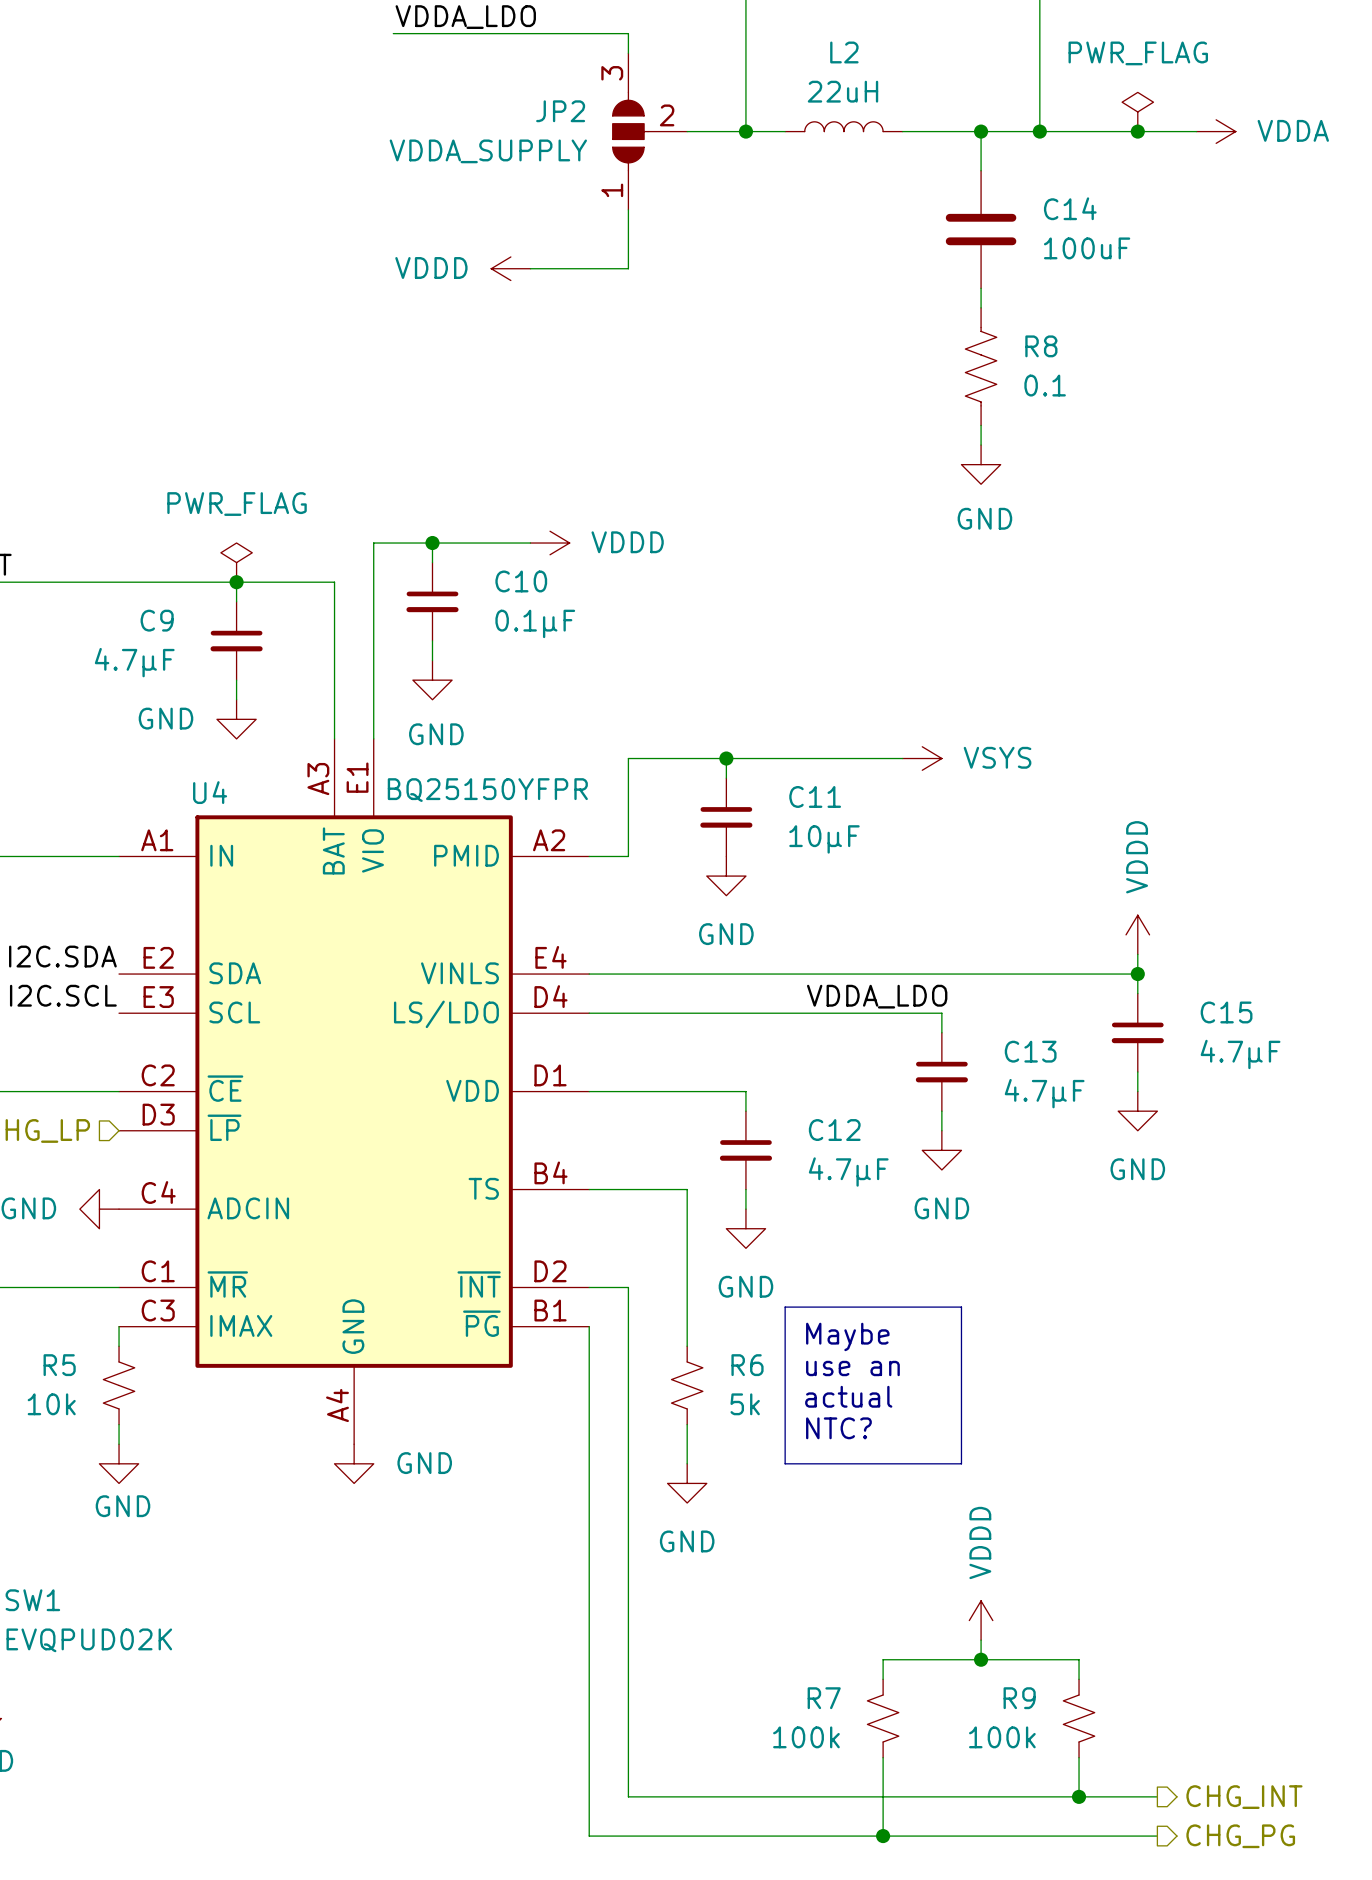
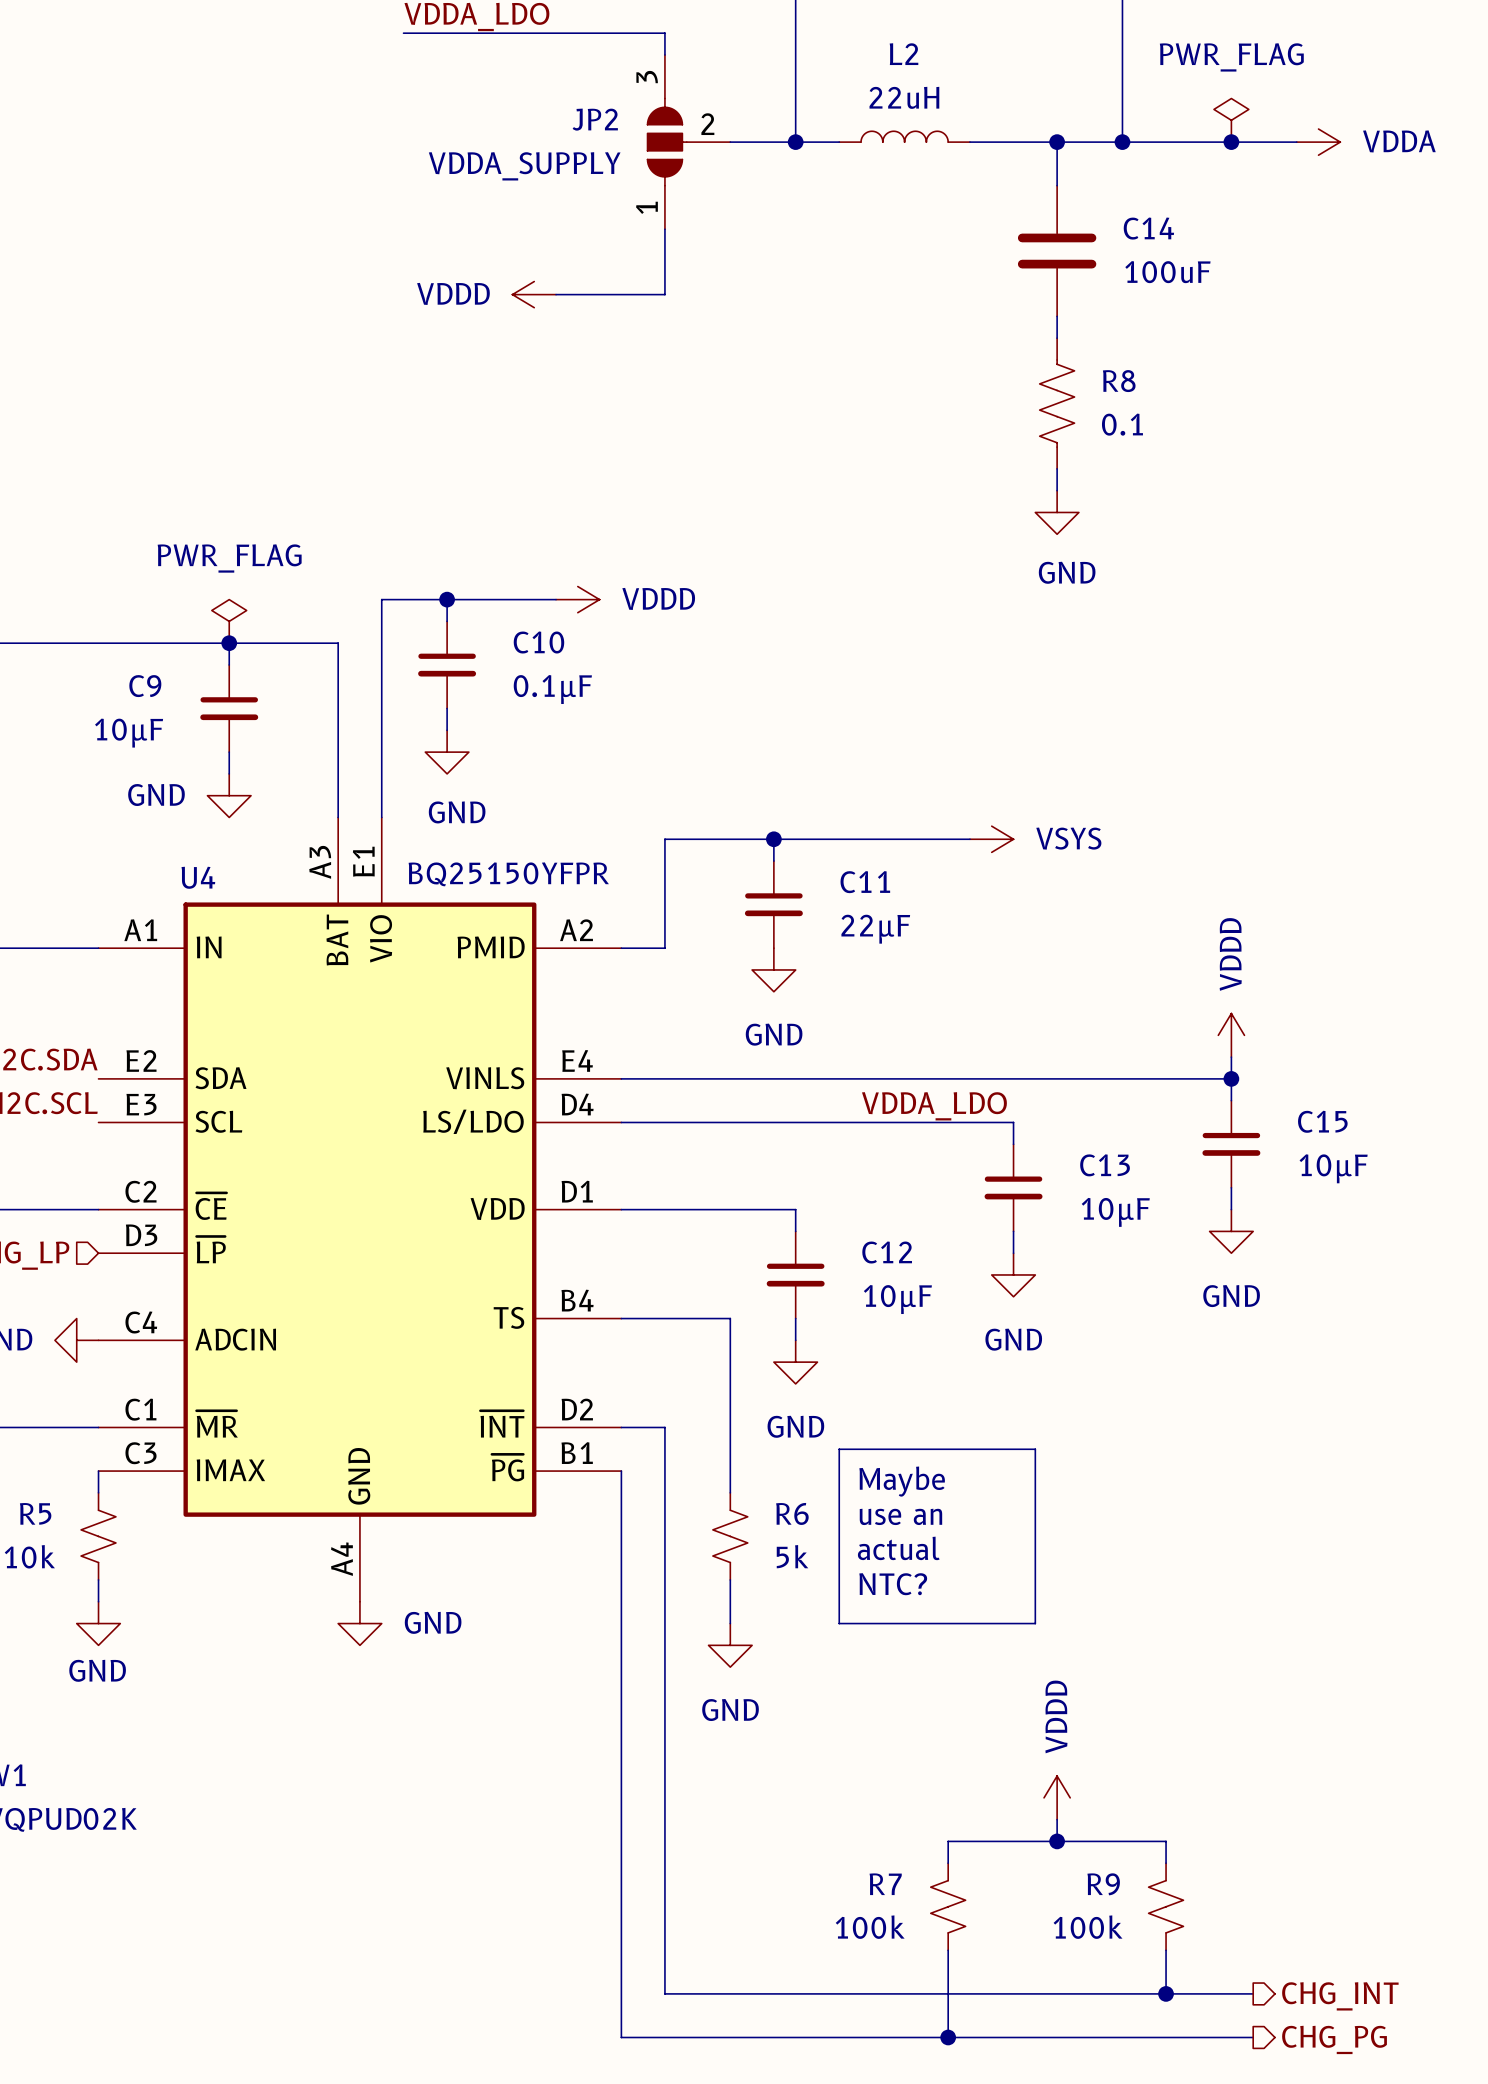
C9 value: 4.7µF (134, 662) -> 10µF (129, 733)
C11 value: 10µF (824, 839) -> 22µF (875, 929)
C15 value: 4.7µF (1240, 1054) -> 10µF (1333, 1168)
C13 value: 4.7µF (1044, 1093) -> 10µF (1115, 1212)
C12 value: 4.7µF (848, 1172) -> 10µF (897, 1299)

